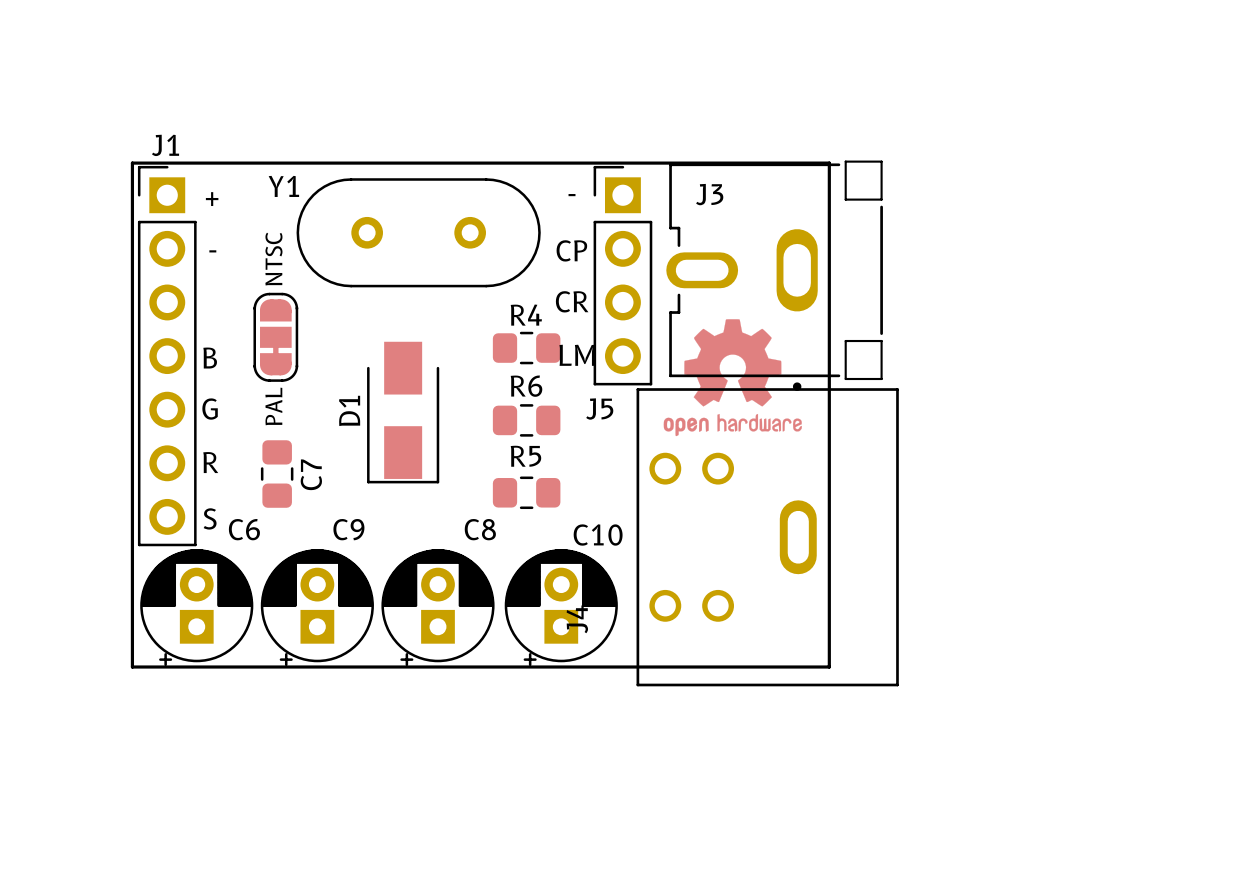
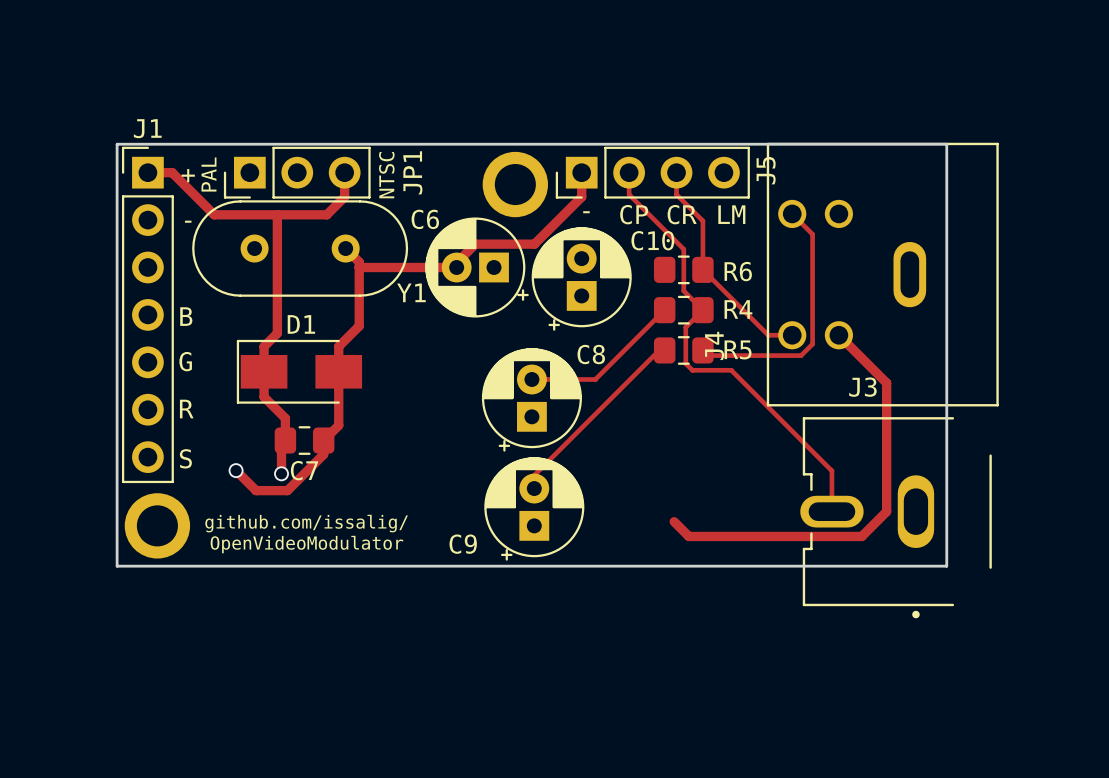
J3 footprint: [666, 160, 883, 391] -> [800, 417, 992, 619]
board edge: (829, 163) (829, 667) (132, 667) (132, 640) -> (733, 144) (946, 144) (946, 566) (117, 566)
Y1 name position: Y1 (283, 186) -> Y1 (411, 292)
J3 name position: J3 (709, 194) -> J3 (862, 387)
track: none -> (147, 172) (172, 172) (214, 214) (326, 214) (344, 196) (344, 172)
JP1: none -> (297, 172)
text position: - (572, 195) -> - (586, 212)
track: none -> (581, 172) (581, 196) (534, 244) (475, 244) (456, 262) (456, 267) (359, 267)
track: none -> (629, 172) (629, 194) (683, 249) (683, 291) (702, 310) (685, 327) (685, 363) (692, 370) (731, 370) (831, 470) (831, 511)
track: none -> (676, 172) (676, 194) (702, 221) (702, 269) (768, 335) (792, 335)
part: none -> (515, 184)
Y1 position: (418, 232) -> (300, 248)
track: none -> (792, 213) (812, 234) (812, 344) (801, 355) (708, 355) (702, 350)
track: none -> (277, 214) (277, 333) (264, 346) (264, 396) (285, 418) (285, 440) (281, 444) (281, 473)
text position: CP (571, 250) -> CP (634, 214)
text position: NTSC (273, 259) -> NTSC (386, 175)
J5 rotation: 0° (622, 275) -> 90° counterclockwise (652, 172)
J5 position: (622, 275) -> (652, 172)
track: none -> (345, 248) (359, 262) (359, 326) (338, 346) (338, 425) (323, 440) (323, 454) (287, 490) (256, 490) (236, 470)
text position: CR (572, 301) -> CR (682, 214)
R4 name position: R4 (526, 315) -> R4 (738, 309)
drawing: [663, 319, 802, 437] -> none
part: (275, 337) -> none
R4 position: (526, 348) -> (683, 310)
track: none -> (664, 310) (595, 379) (531, 379)
text position: LM (577, 355) -> LM (731, 214)
track: none -> (838, 335) (886, 383) (886, 511) (861, 536) (688, 536) (674, 521)
R6 name position: R6 (526, 386) -> R6 (738, 271)
track: none -> (664, 350) (659, 350) (534, 475) (534, 488)
text position: PAL (273, 406) -> PAL (209, 174)
D1 rotation: 0° (403, 412) -> 90° clockwise (299, 371)
R6 position: (526, 420) -> (683, 269)
R5 name position: R5 (525, 456) -> R5 (738, 349)
C7 rotation: 0° (277, 474) -> 90° clockwise (304, 440)
C7 position: (277, 474) -> (304, 440)
R5 position: (526, 492) -> (683, 350)
C9 name position: C9 (348, 529) -> C9 (463, 544)
C8 name position: C8 (480, 529) -> C8 (591, 354)
via: none -> (236, 470)
C10 name position: C10 (598, 534) -> C10 (652, 240)
via: none -> (281, 473)
J4 position: (767, 537) -> (882, 274)
text: none -> github.com/issalig/ (306, 523)
part: none -> (157, 525)
C6 rotation: 0° (196, 607) -> 90° counterclockwise (477, 267)
C6 position: (196, 607) -> (477, 267)
C9 position: (317, 607) -> (534, 508)
C8 position: (437, 607) -> (531, 399)
C10 position: (561, 607) -> (581, 279)
text: none -> OpenVideoModulator (306, 544)

